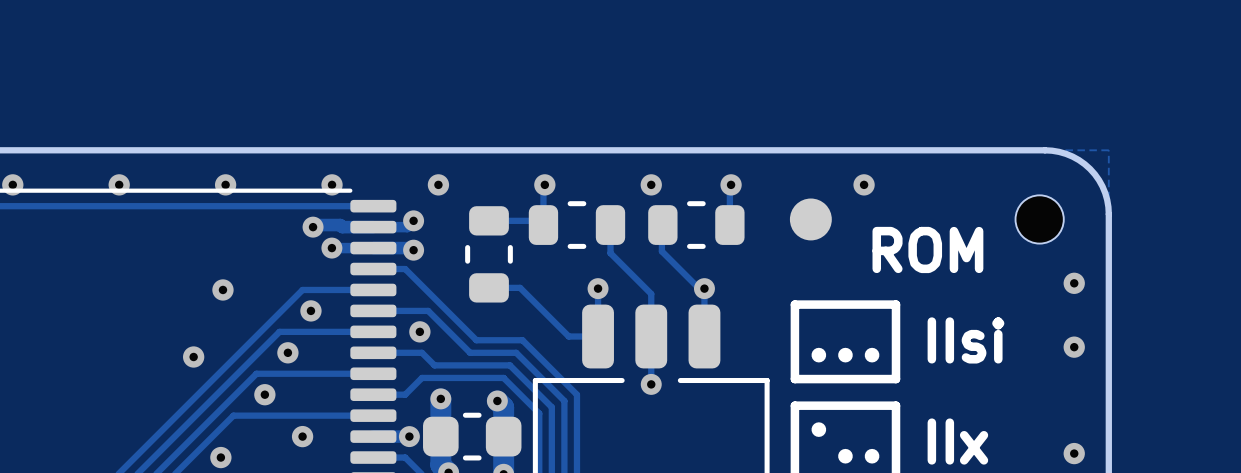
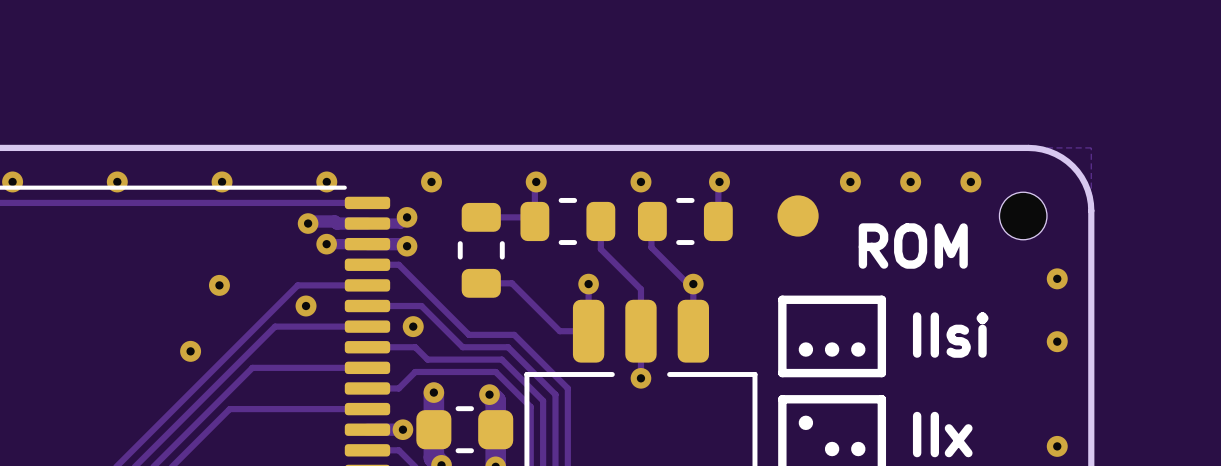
via: none -> (910, 181)
via: none -> (970, 181)
via: (287, 352) -> none
via: (264, 394) -> none
via: (302, 436) -> none
via: (220, 457) -> none

